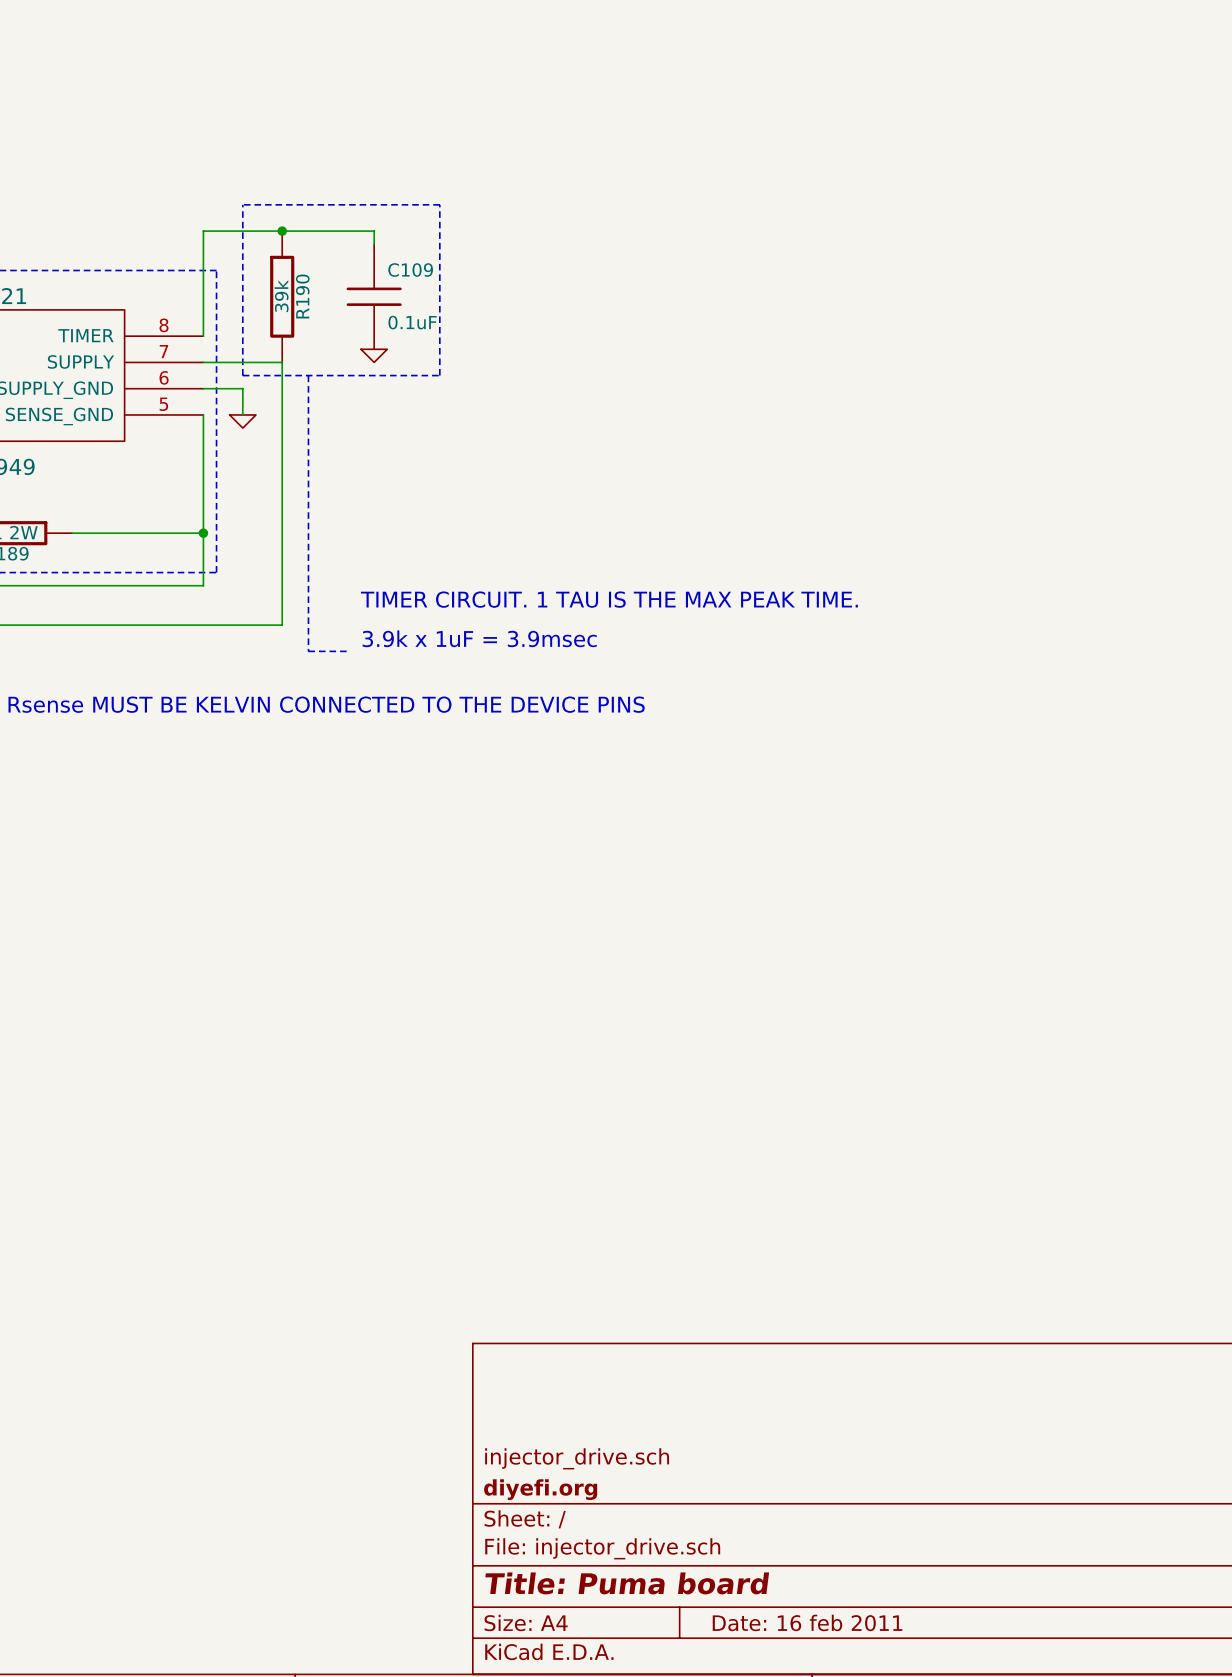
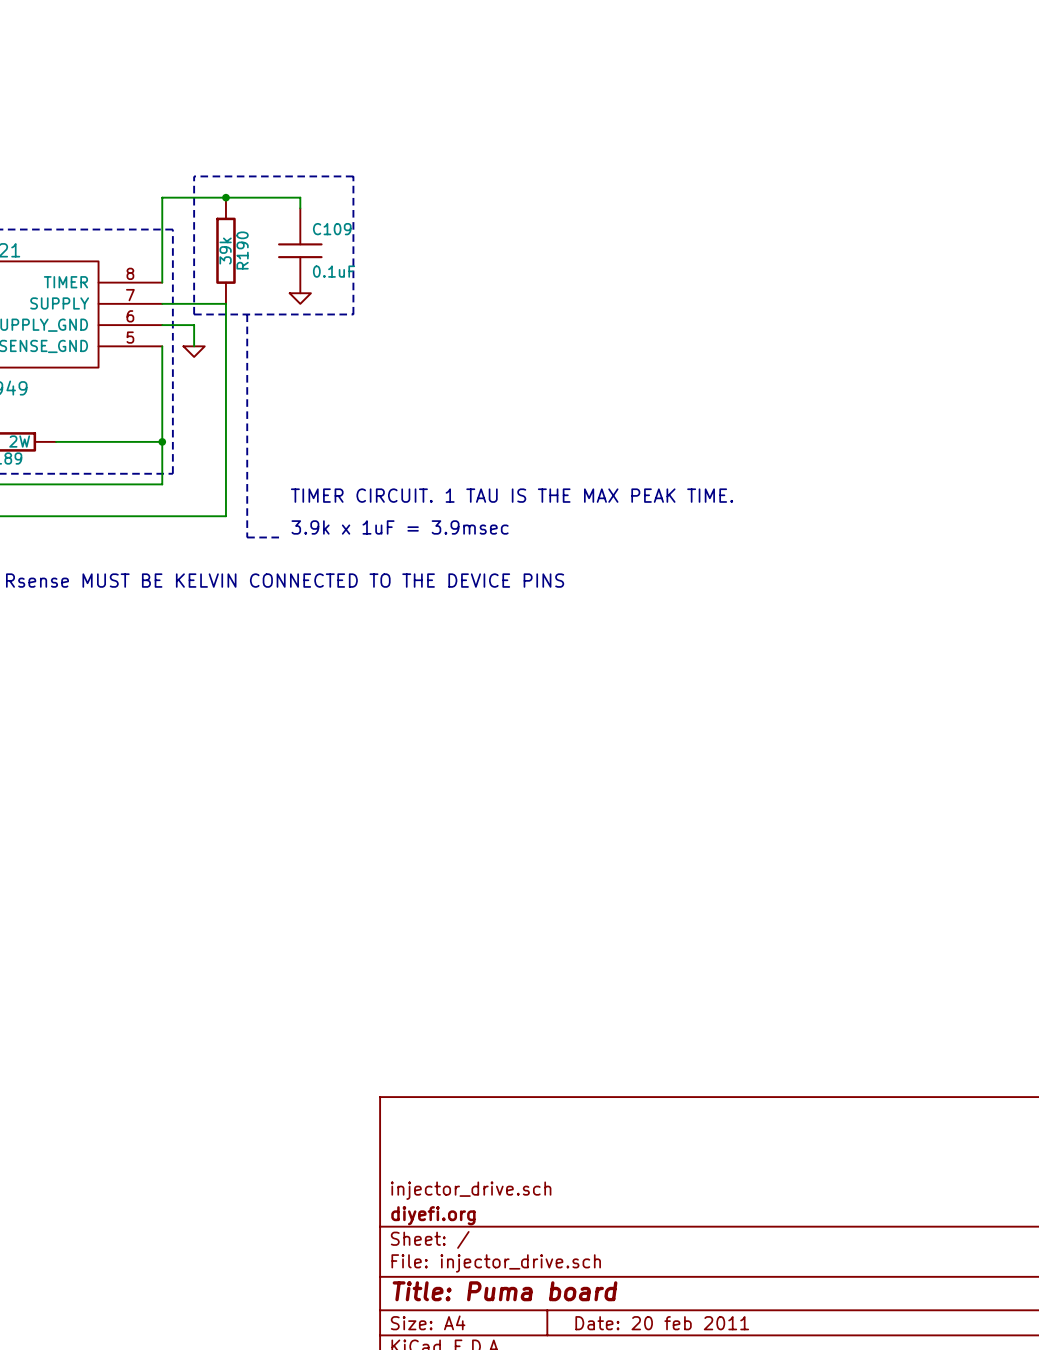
title block: Date: 16 feb 2011 (807, 1622) -> Date: 20 feb 2011 (662, 1323)

